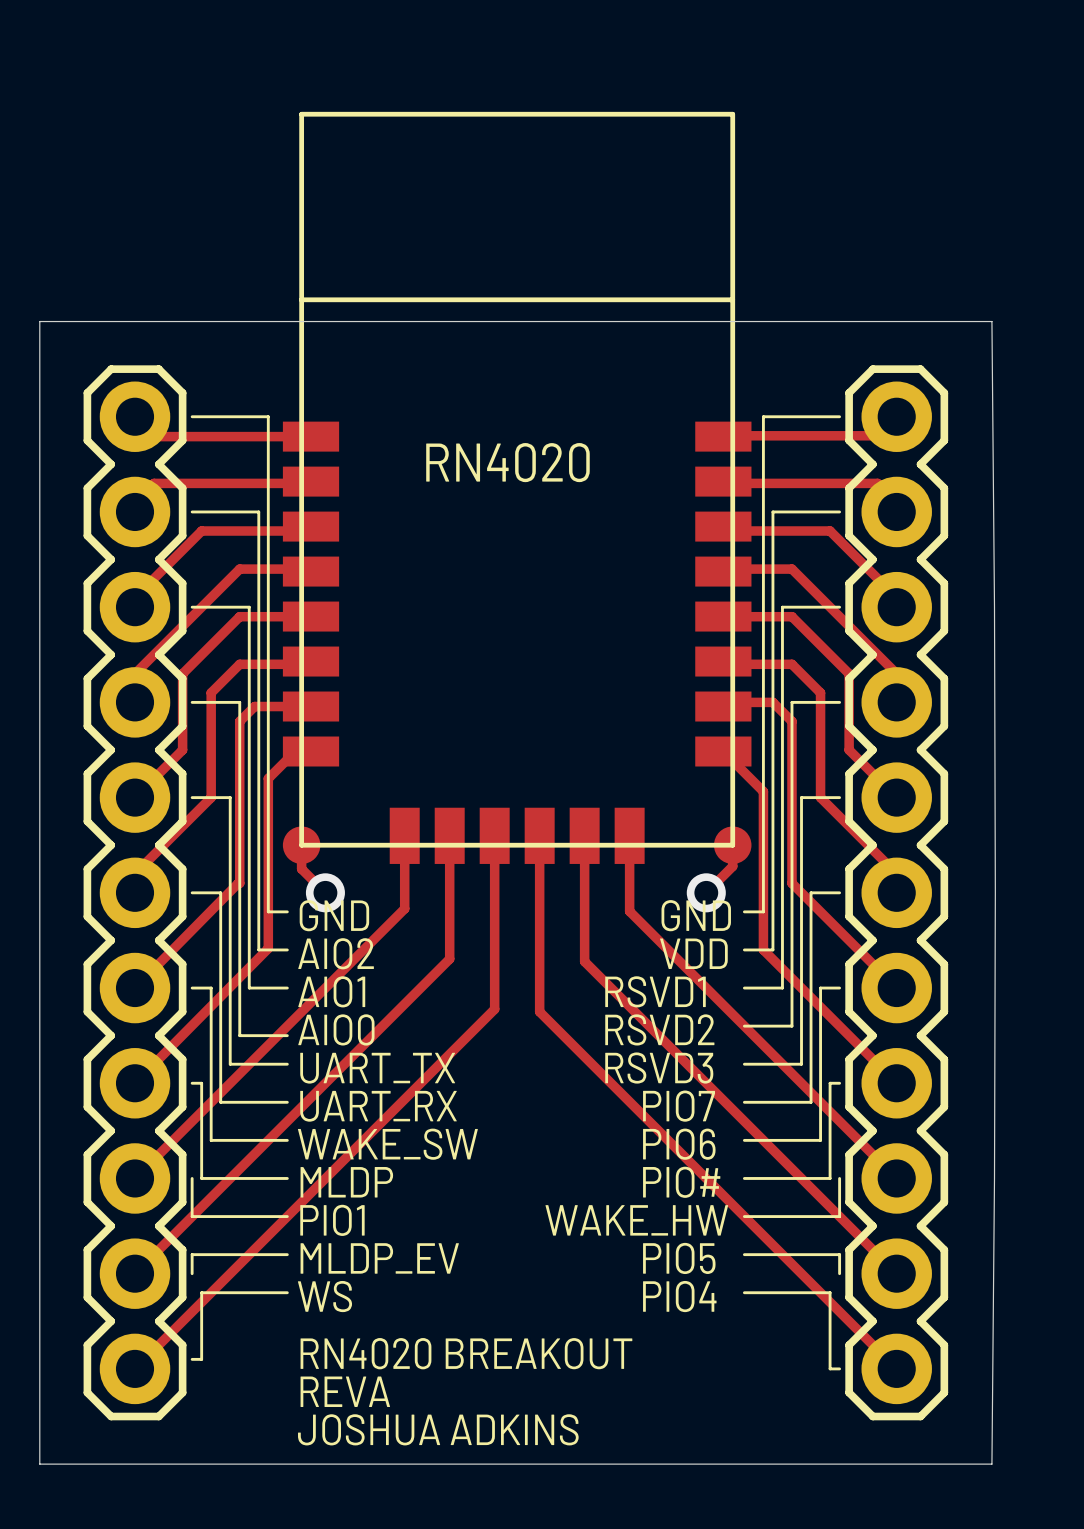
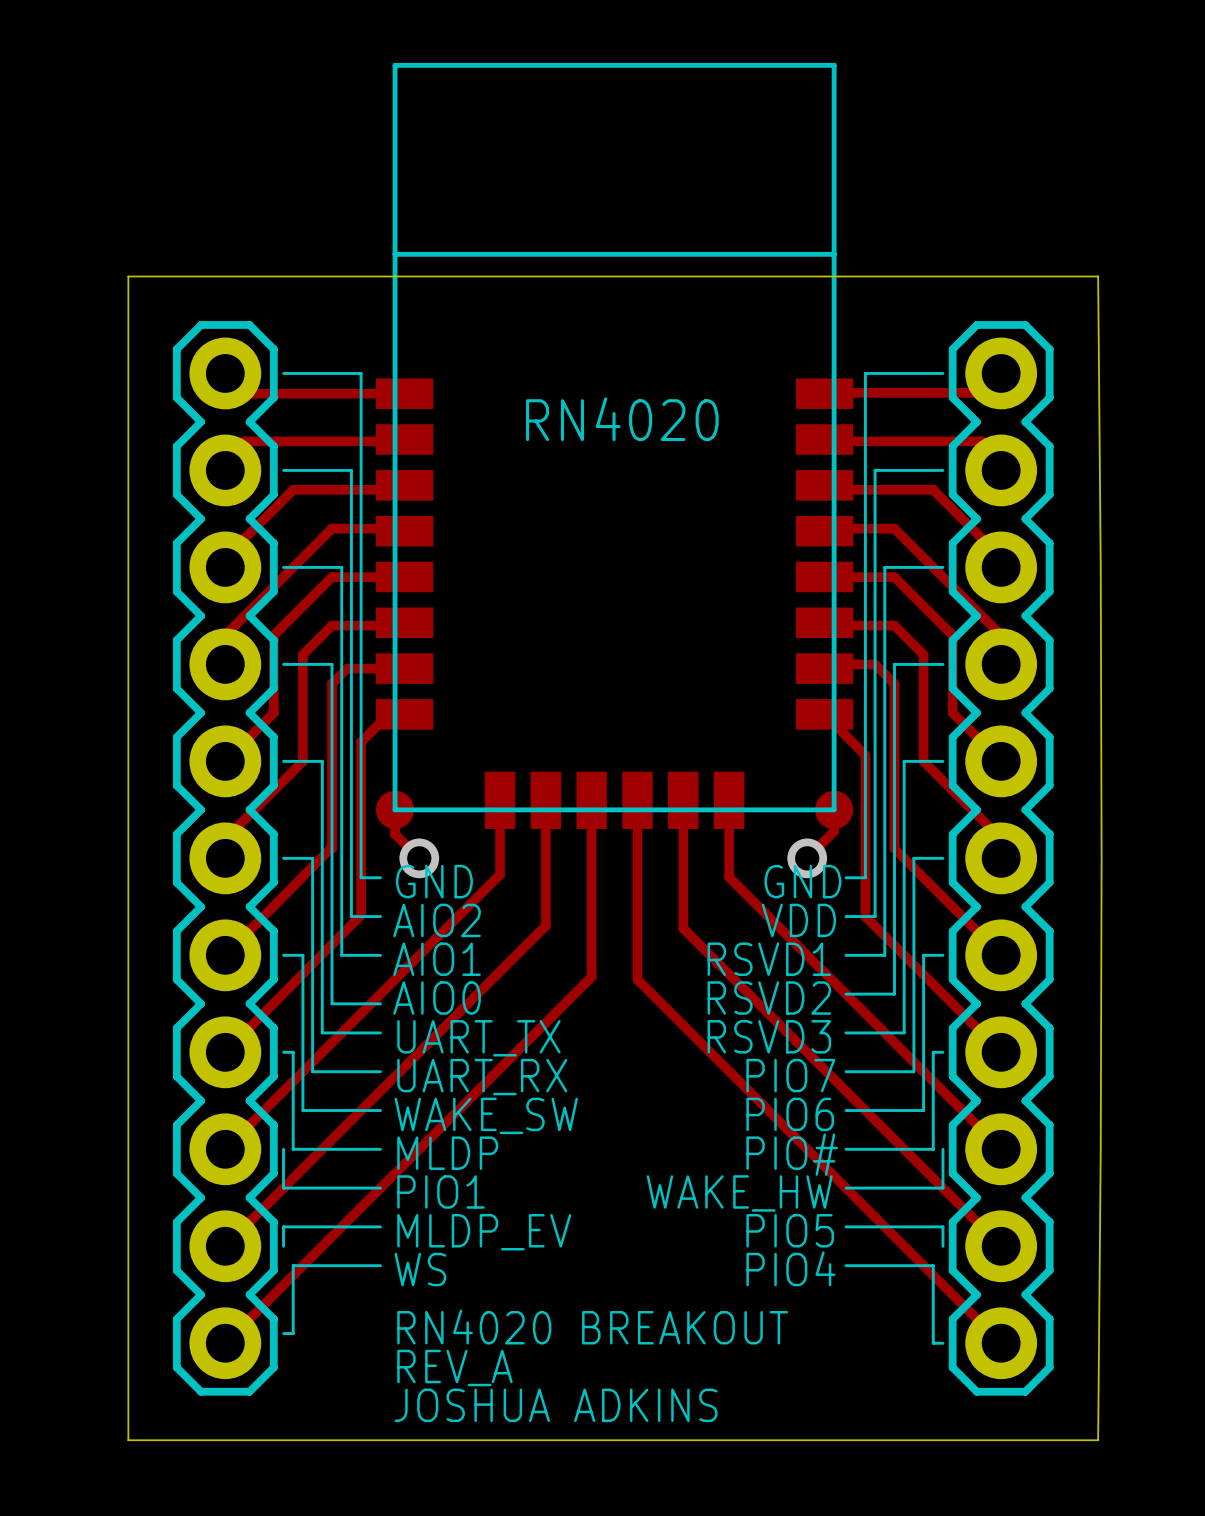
text: REVA (345, 1391) -> REV_A (455, 1368)

